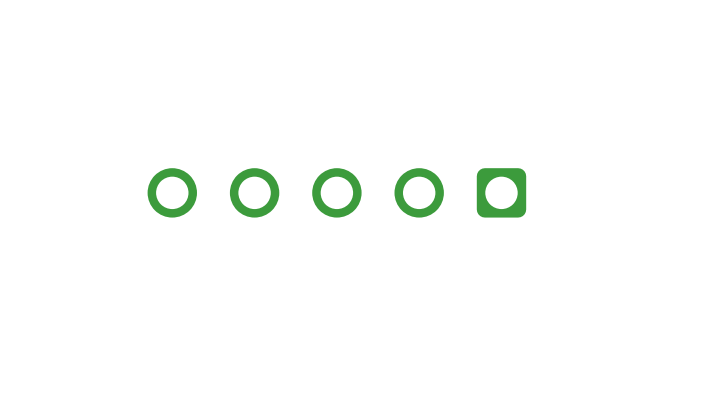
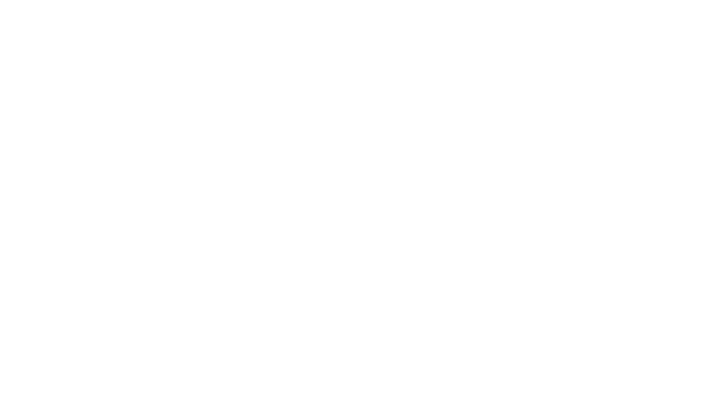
part: (336, 192) -> none

